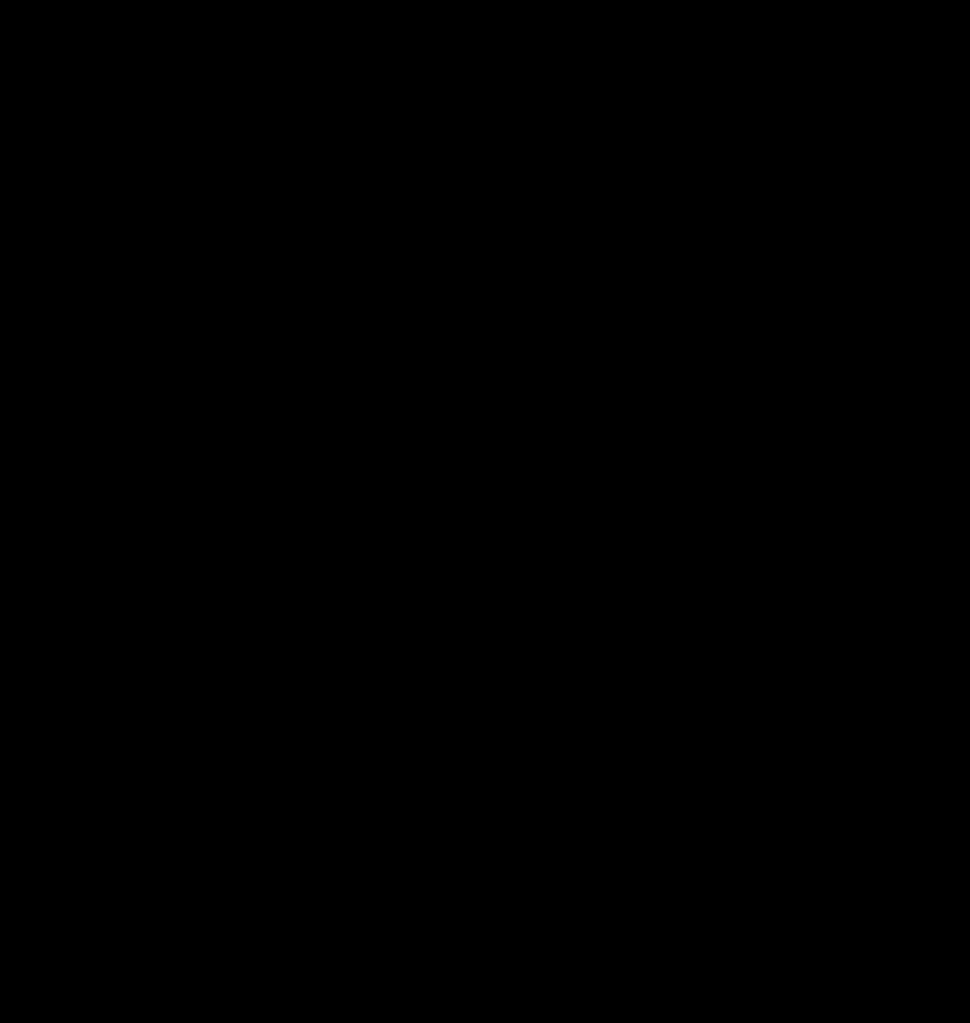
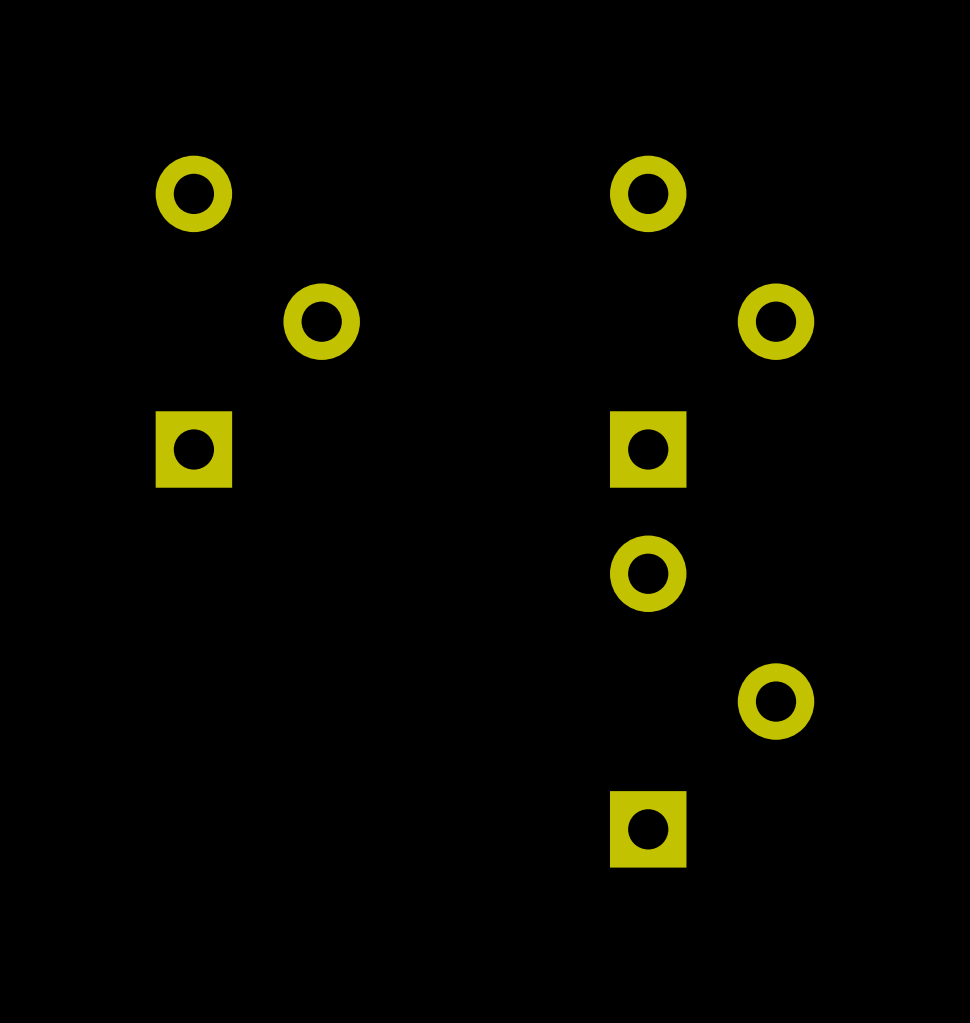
part: none -> (257, 321)
part: none -> (712, 321)
part: none -> (712, 701)

